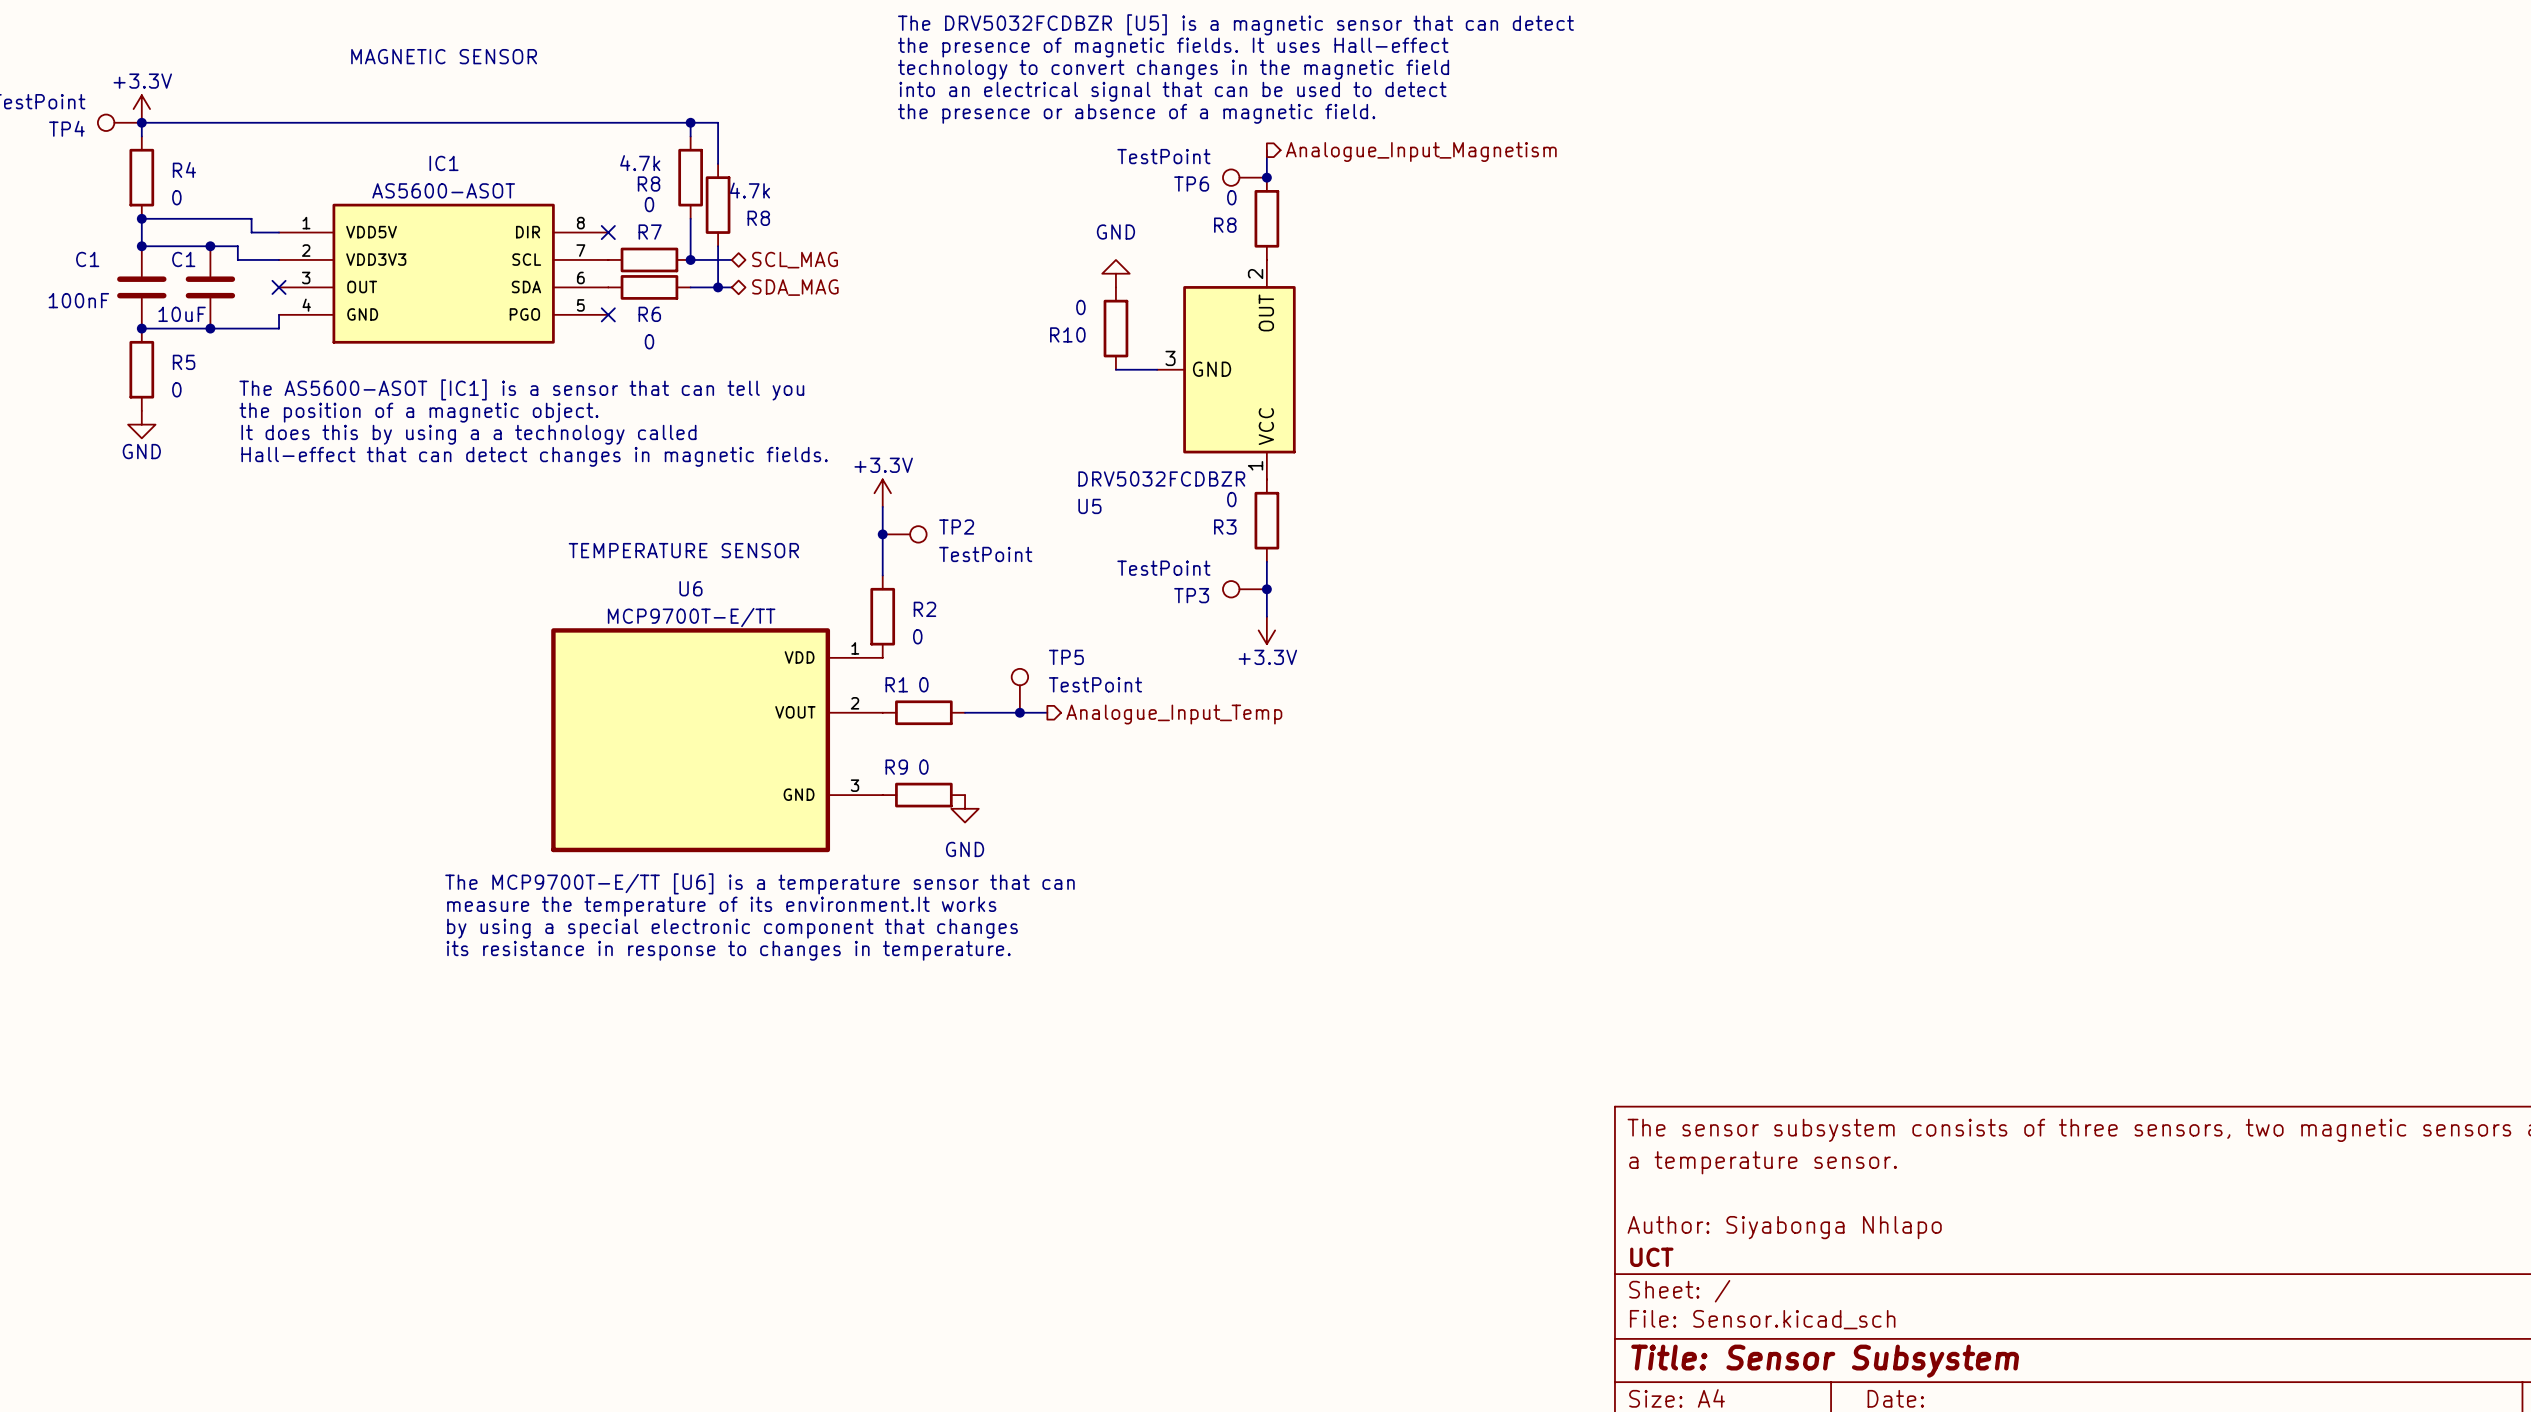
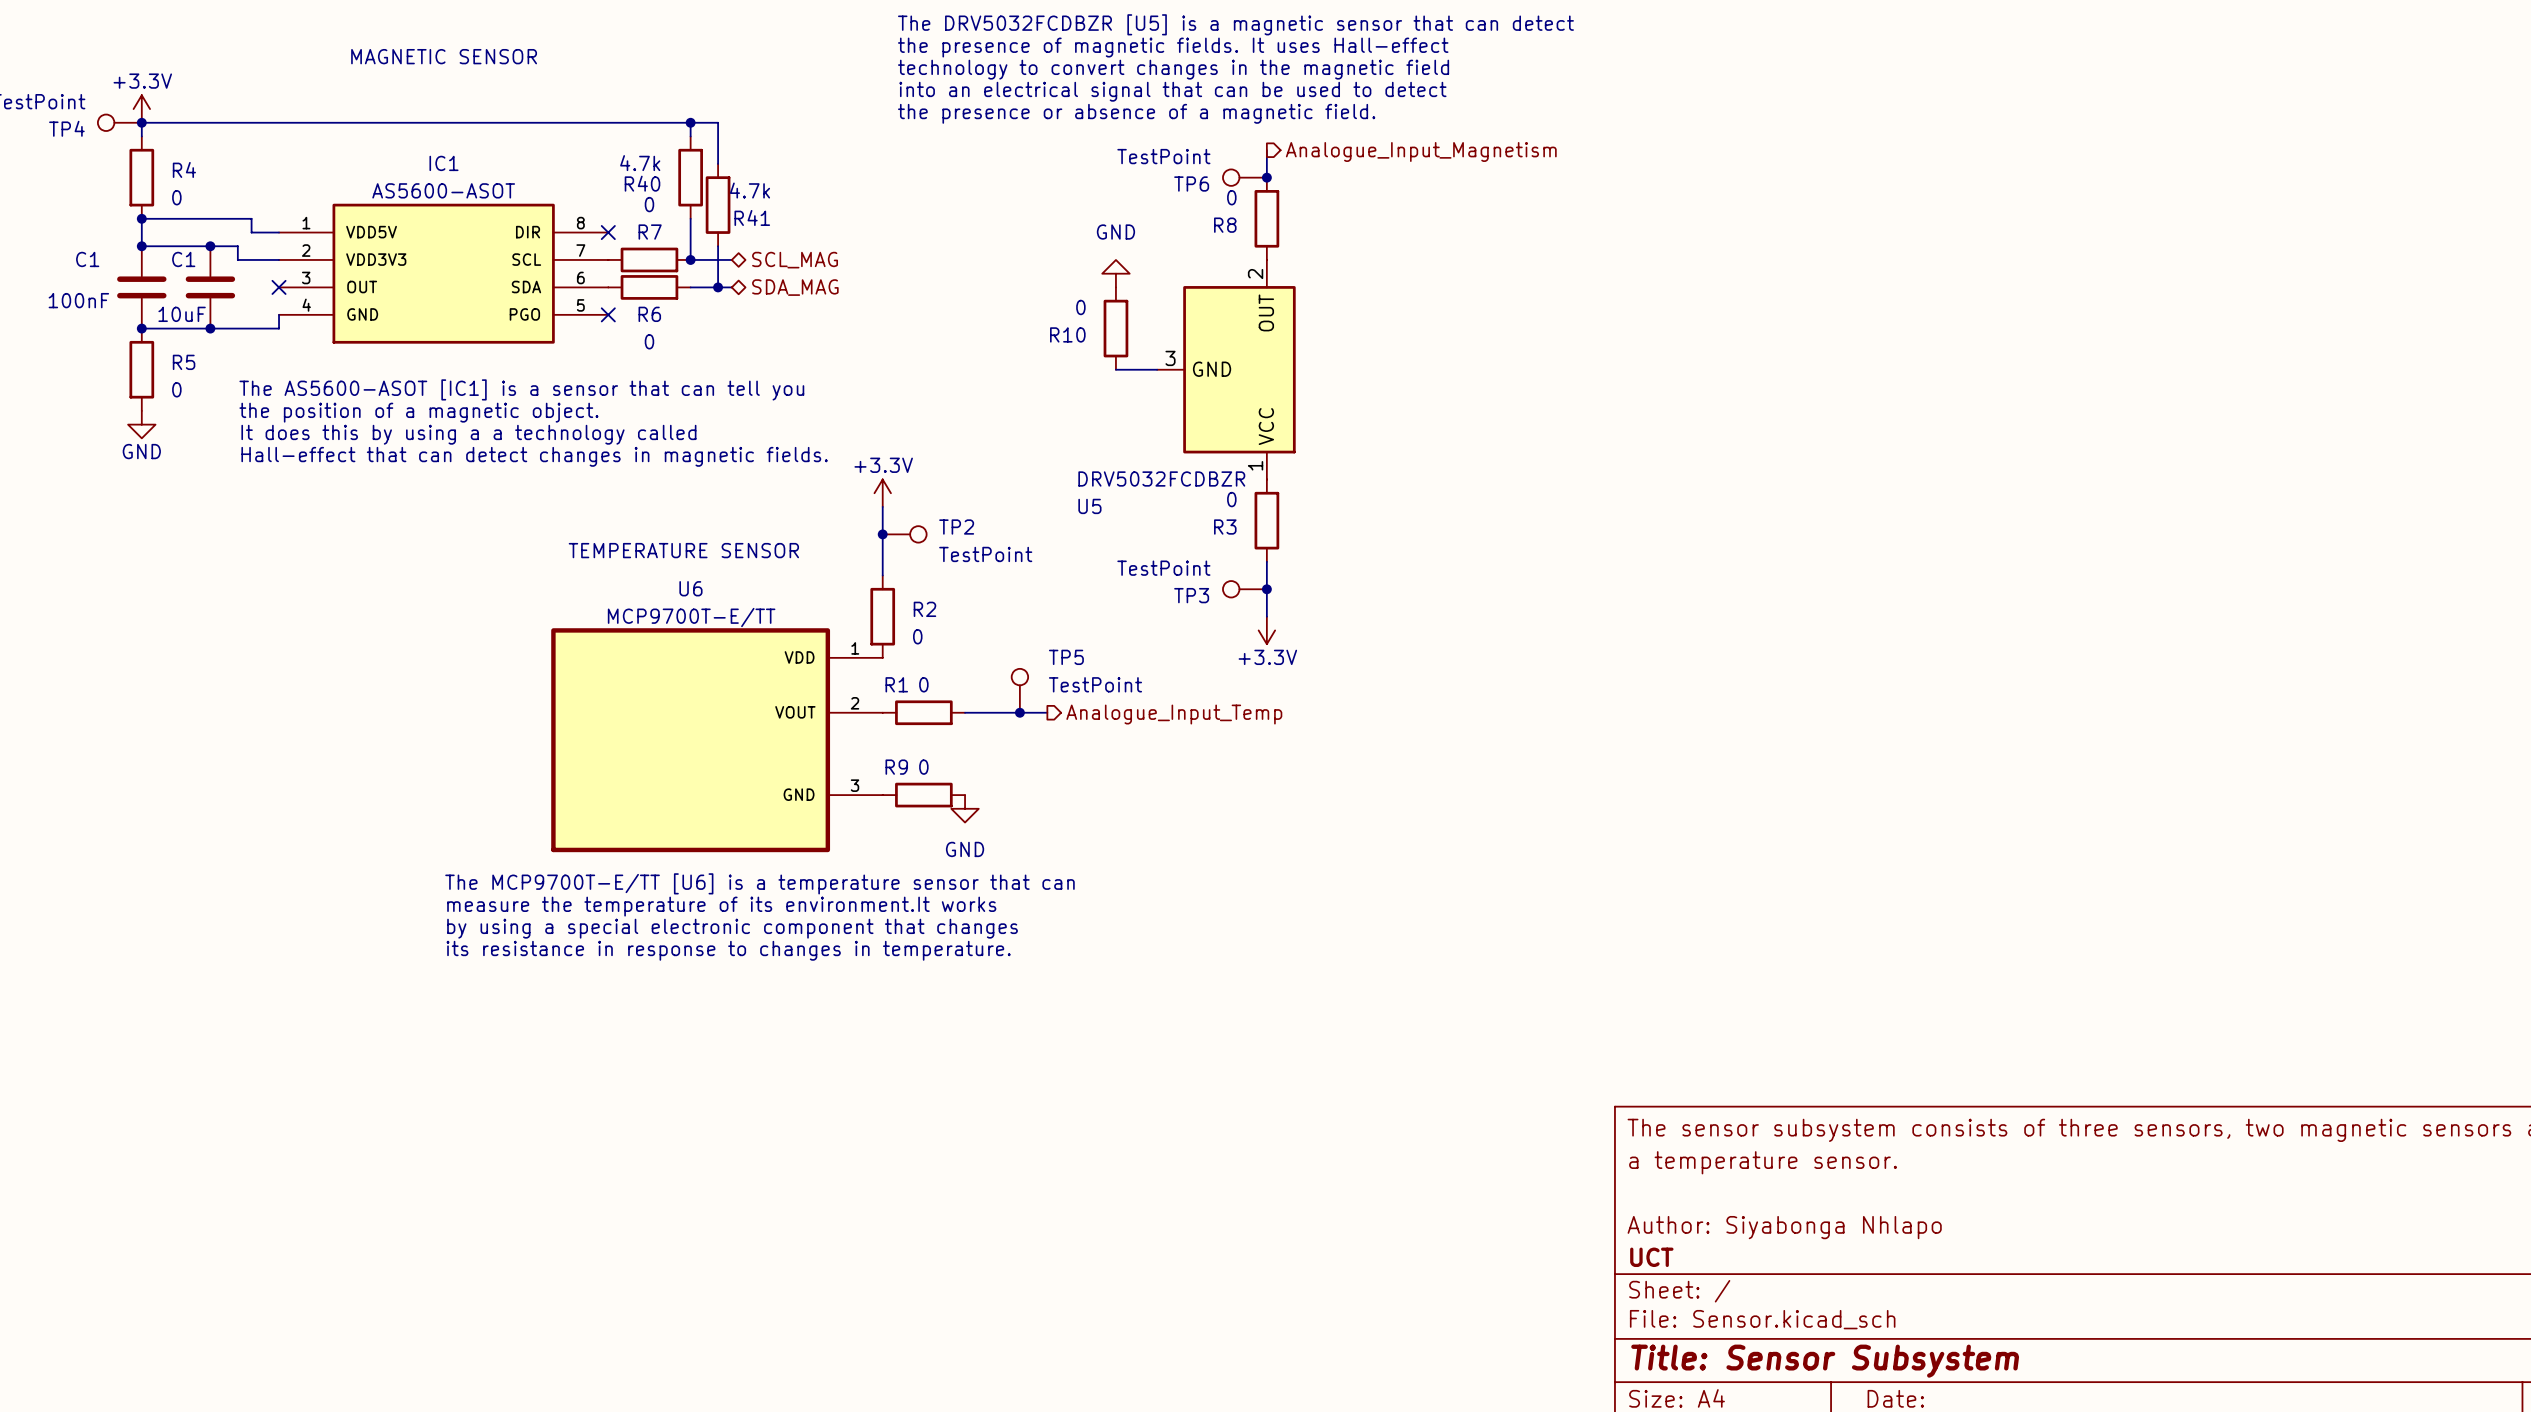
R8 name: R8 (649, 184) -> R40 (642, 183)
R8 name: R8 (758, 218) -> R41 (752, 217)

